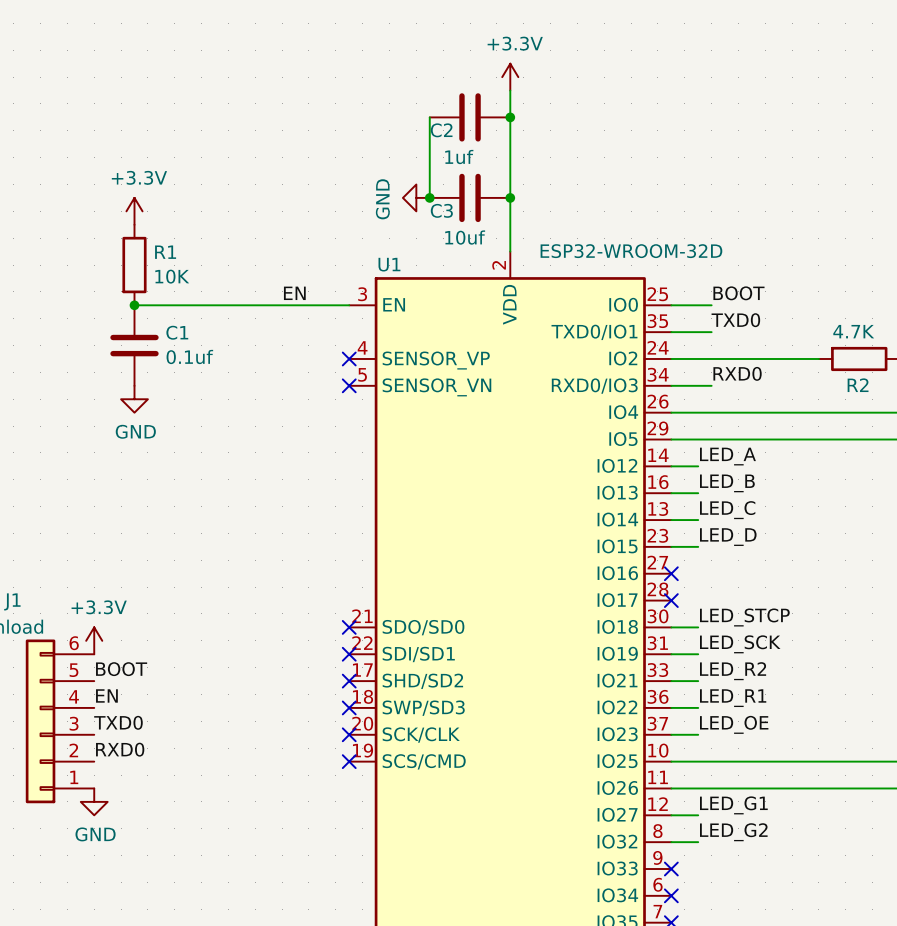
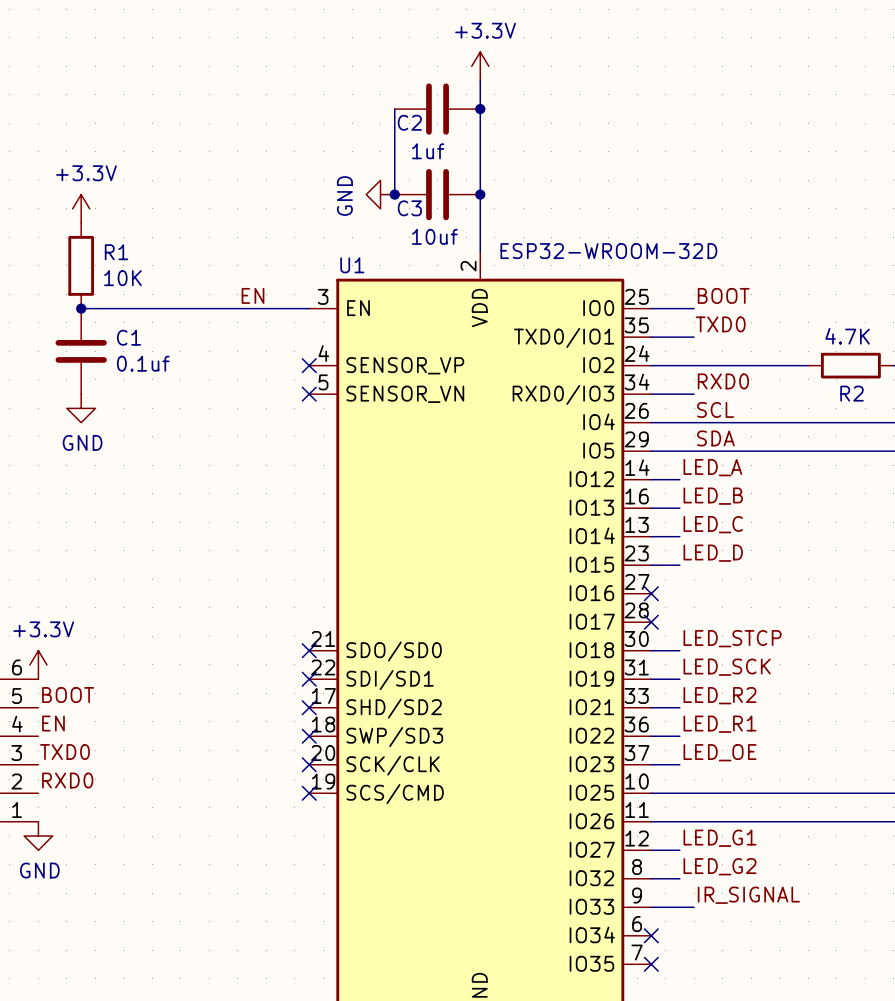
label: none -> SCL (715, 409)
label: none -> SDA (715, 438)
label: none -> IR_SIGNAL (748, 895)
wire: none -> (651, 907) (694, 907)
no-connect mark: (671, 869) -> none

